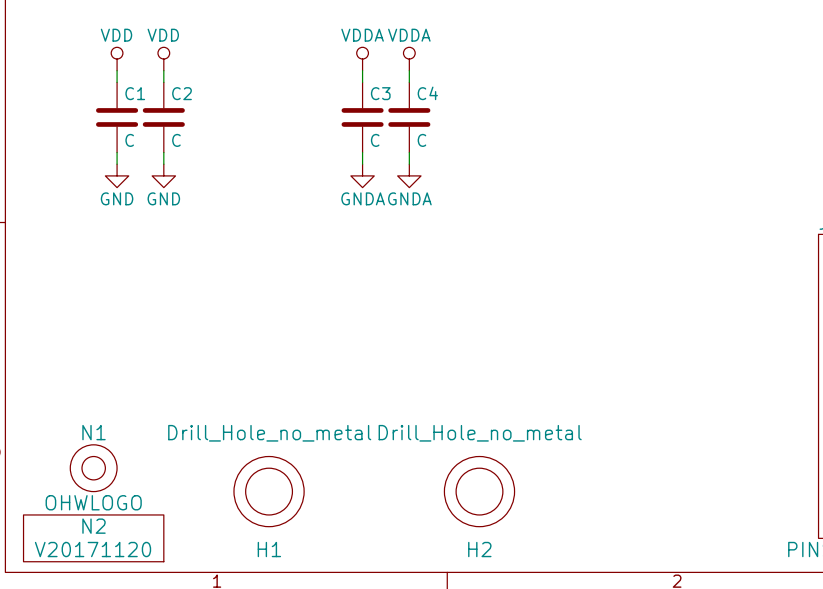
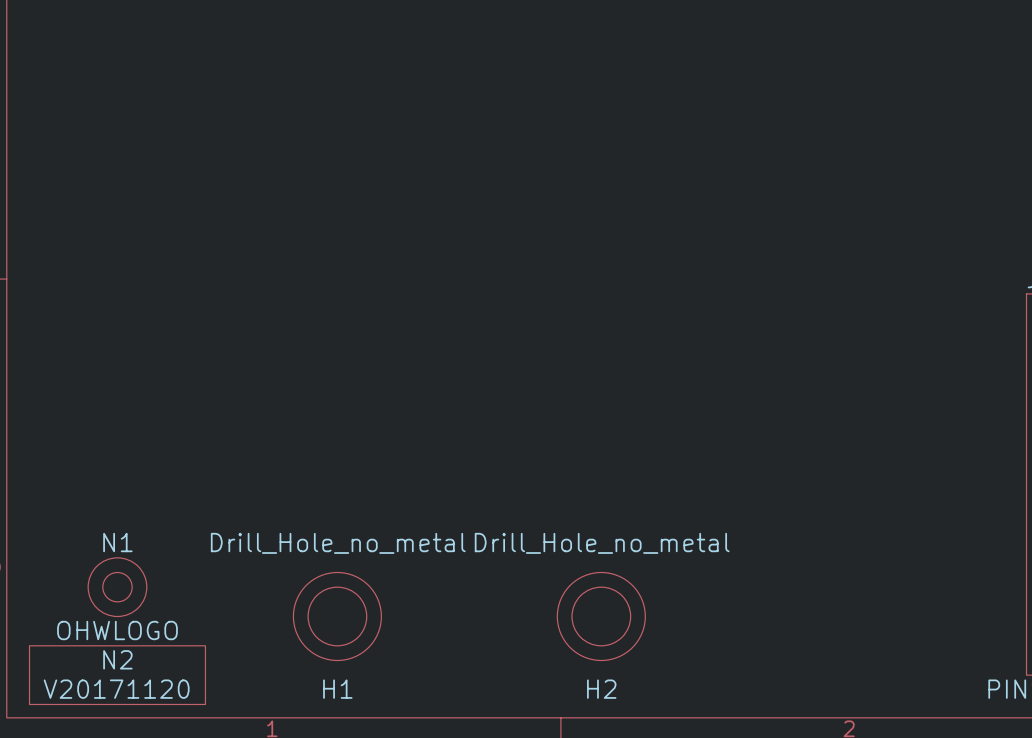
power symbol: VDD (117, 59) -> none
power symbol: VDD (163, 59) -> none
power symbol: VDDA (362, 59) -> none
power symbol: VDDA (409, 59) -> none
wire: (117, 70) (117, 82) -> none
wire: (163, 70) (163, 82) -> none
wire: (362, 70) (362, 82) -> none
wire: (409, 70) (409, 82) -> none
C1: C (117, 117) -> none
C2: C (163, 117) -> none
C3: C (362, 117) -> none
C4: C (409, 117) -> none
wire: (117, 152) (117, 164) -> none
wire: (163, 152) (163, 164) -> none
wire: (362, 152) (362, 164) -> none
wire: (409, 152) (409, 164) -> none
power symbol: GND (117, 175) -> none
power symbol: GND (163, 175) -> none
power symbol: GNDA (362, 175) -> none
power symbol: GNDA (409, 175) -> none

